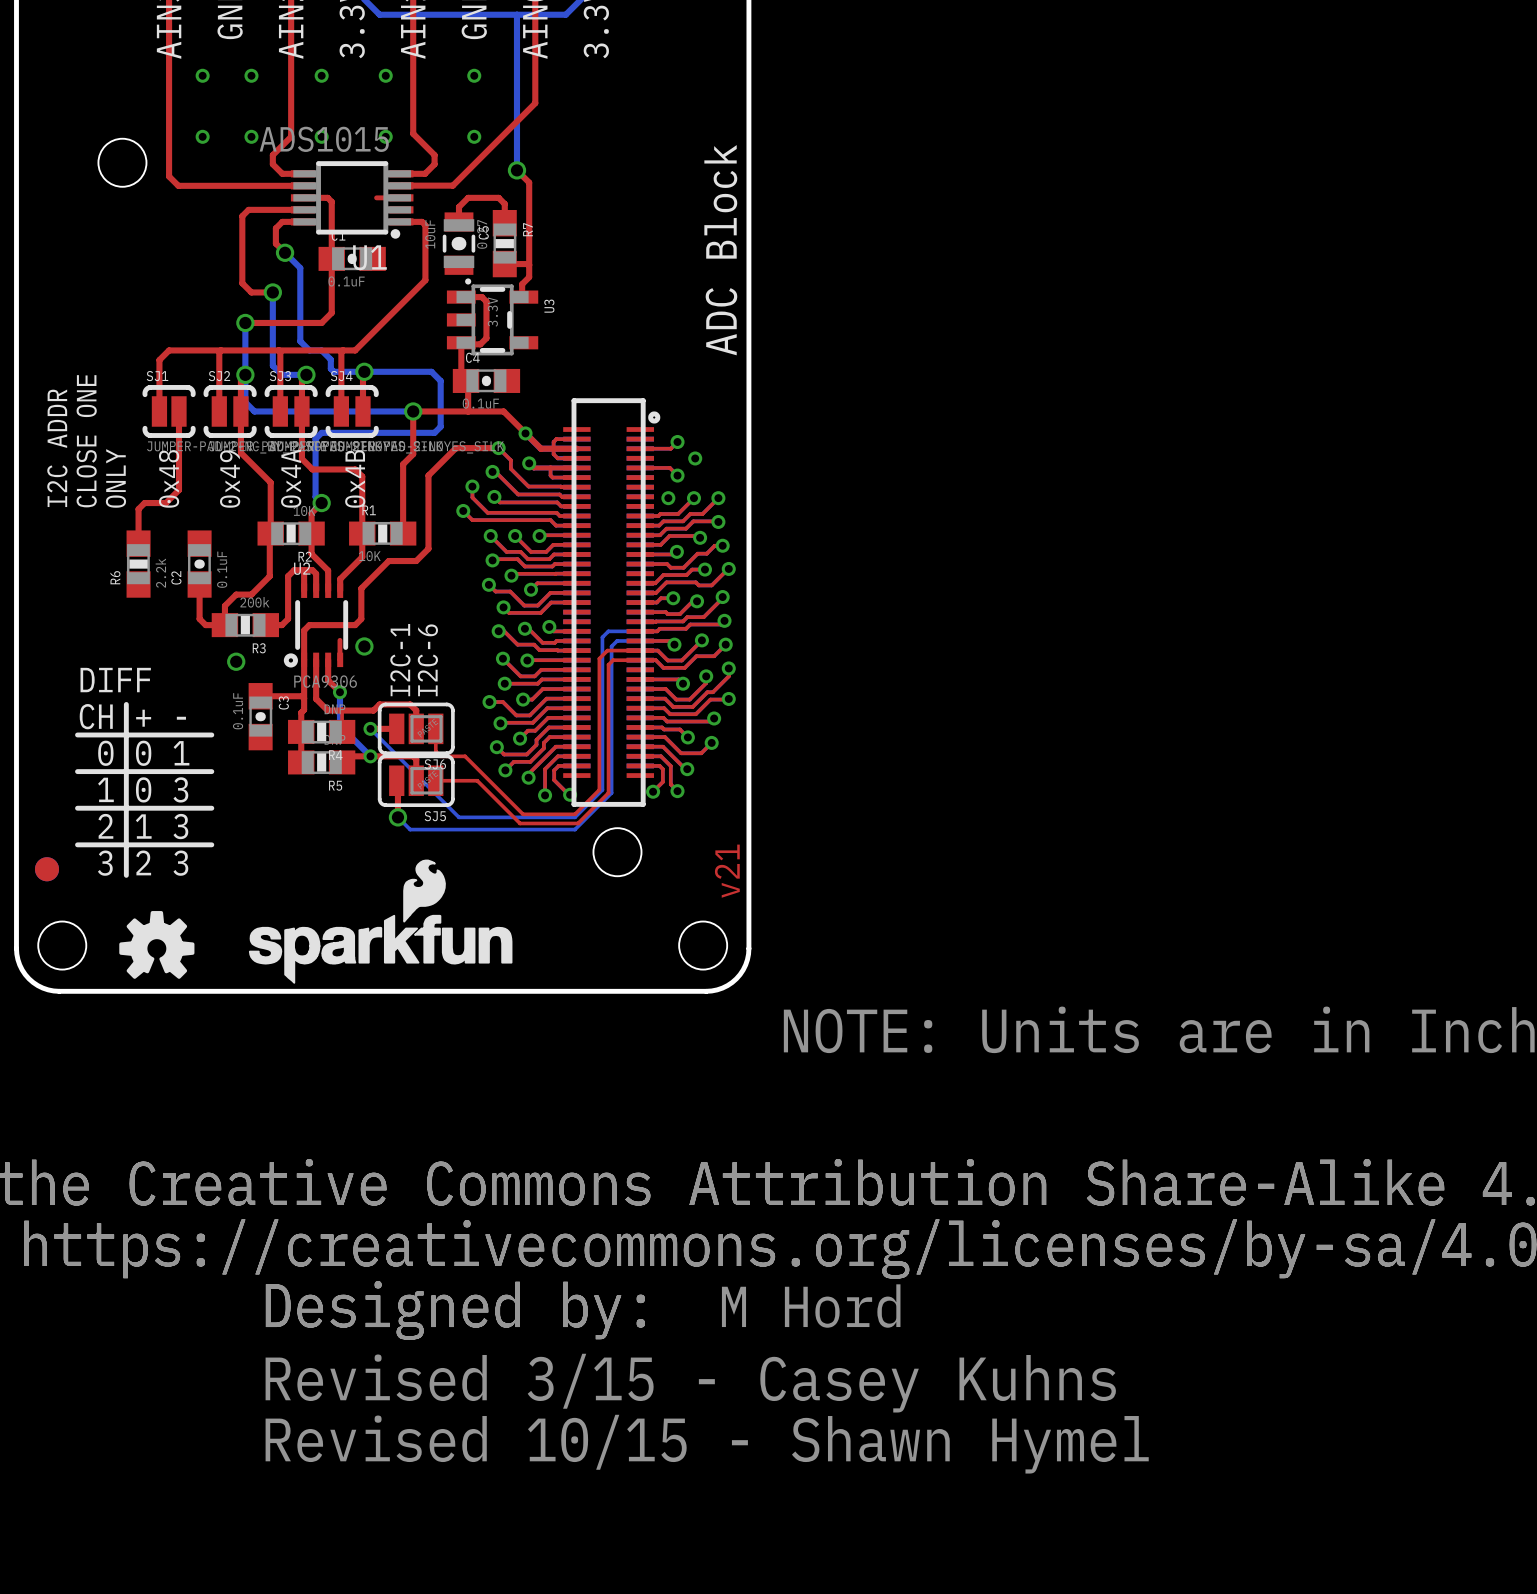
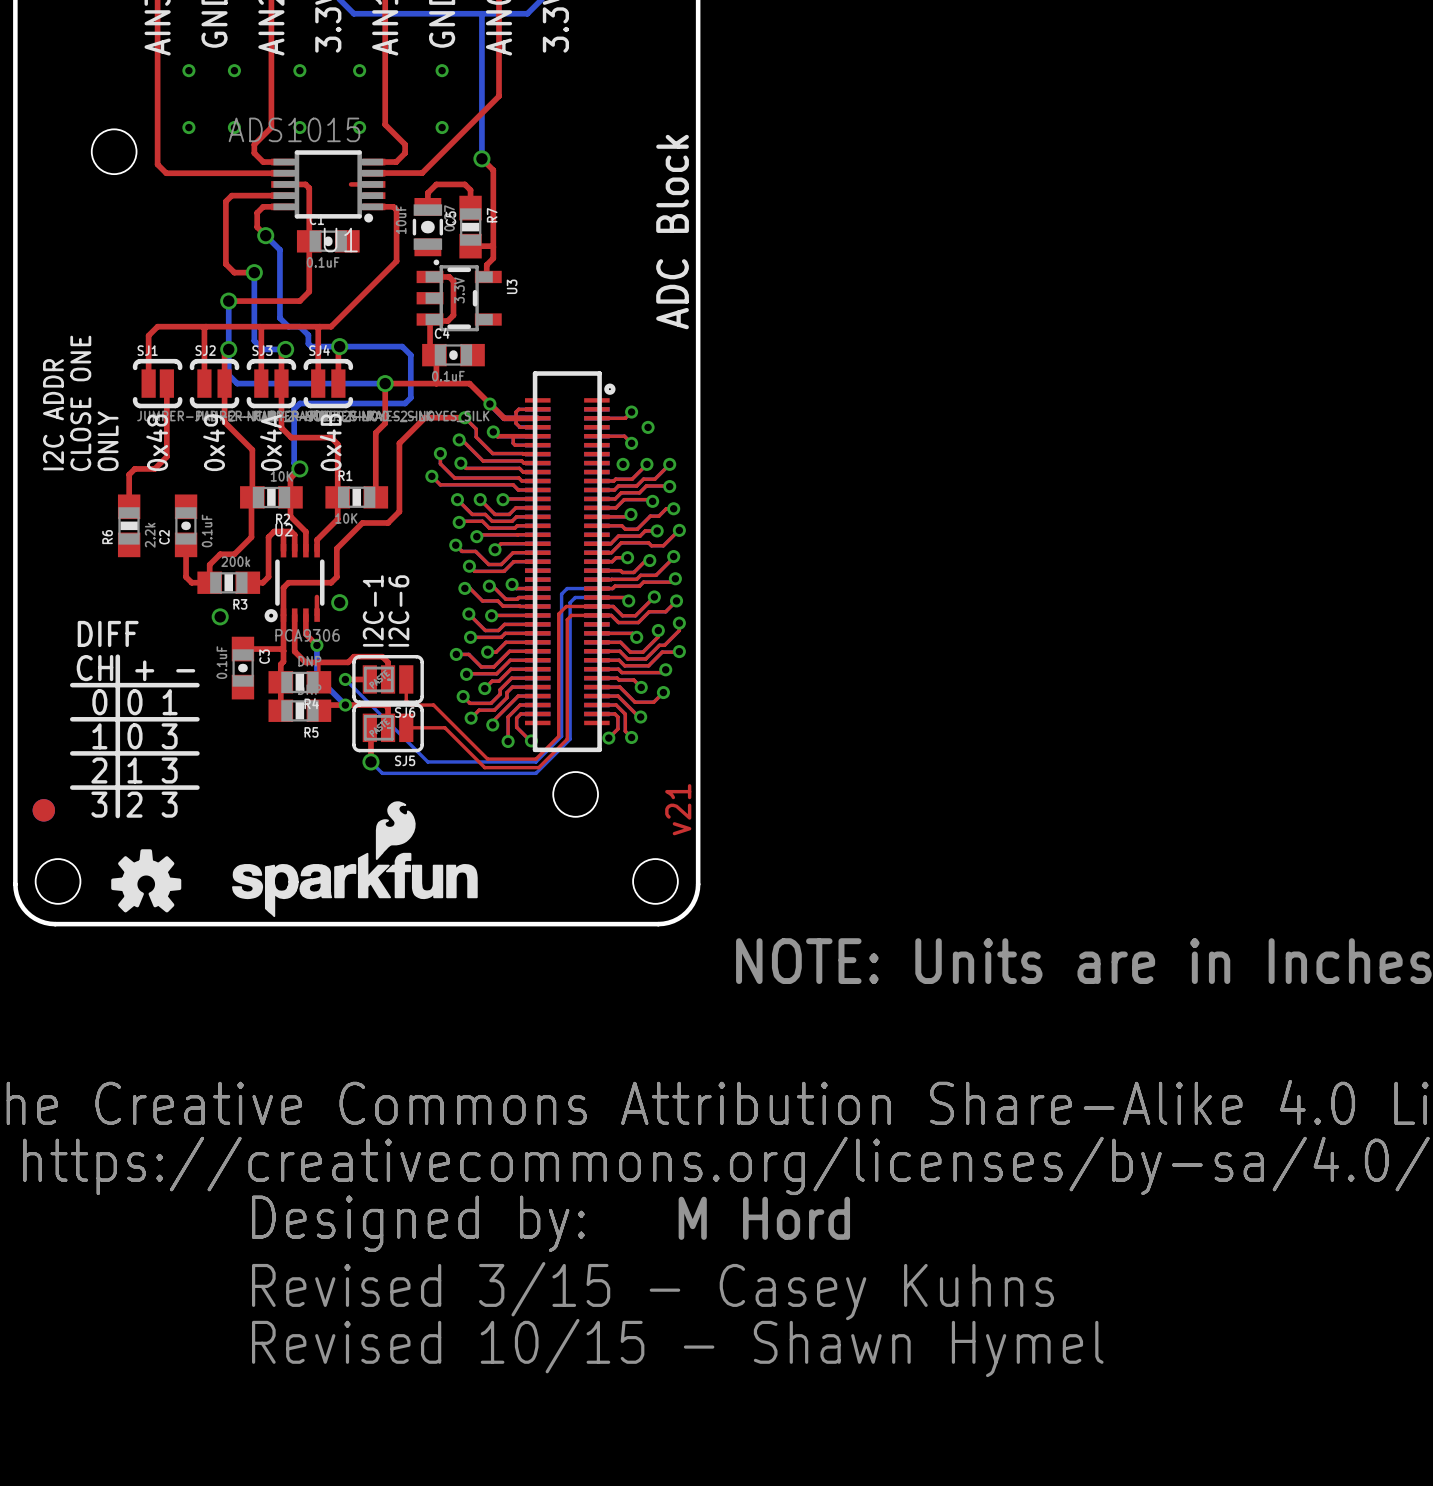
SJ6 footprint: [377, 702, 455, 756] -> [352, 654, 424, 704]
SJ5 footprint: [377, 754, 455, 808] -> [352, 703, 424, 753]

